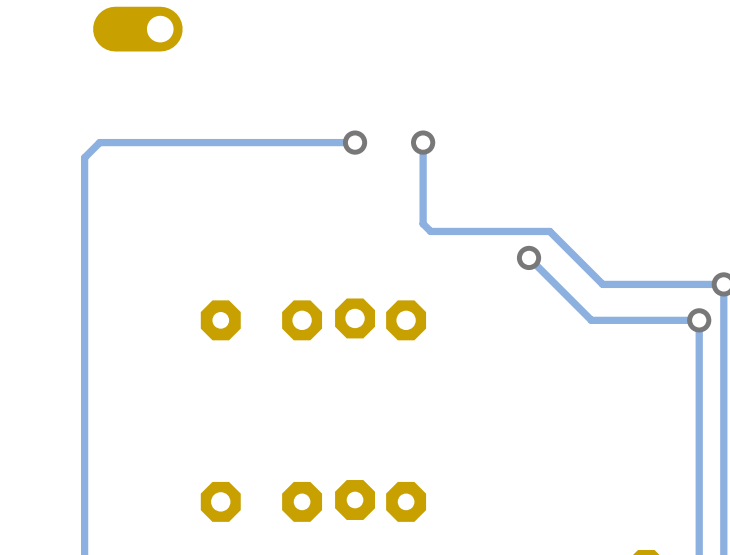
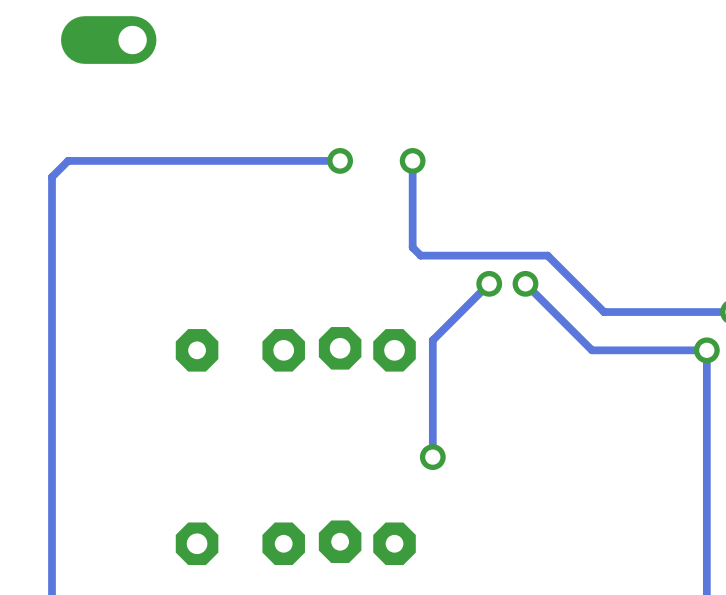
track: none -> (489, 283) (432, 340) (432, 457)
via: none -> (489, 283)
via: none -> (432, 457)

